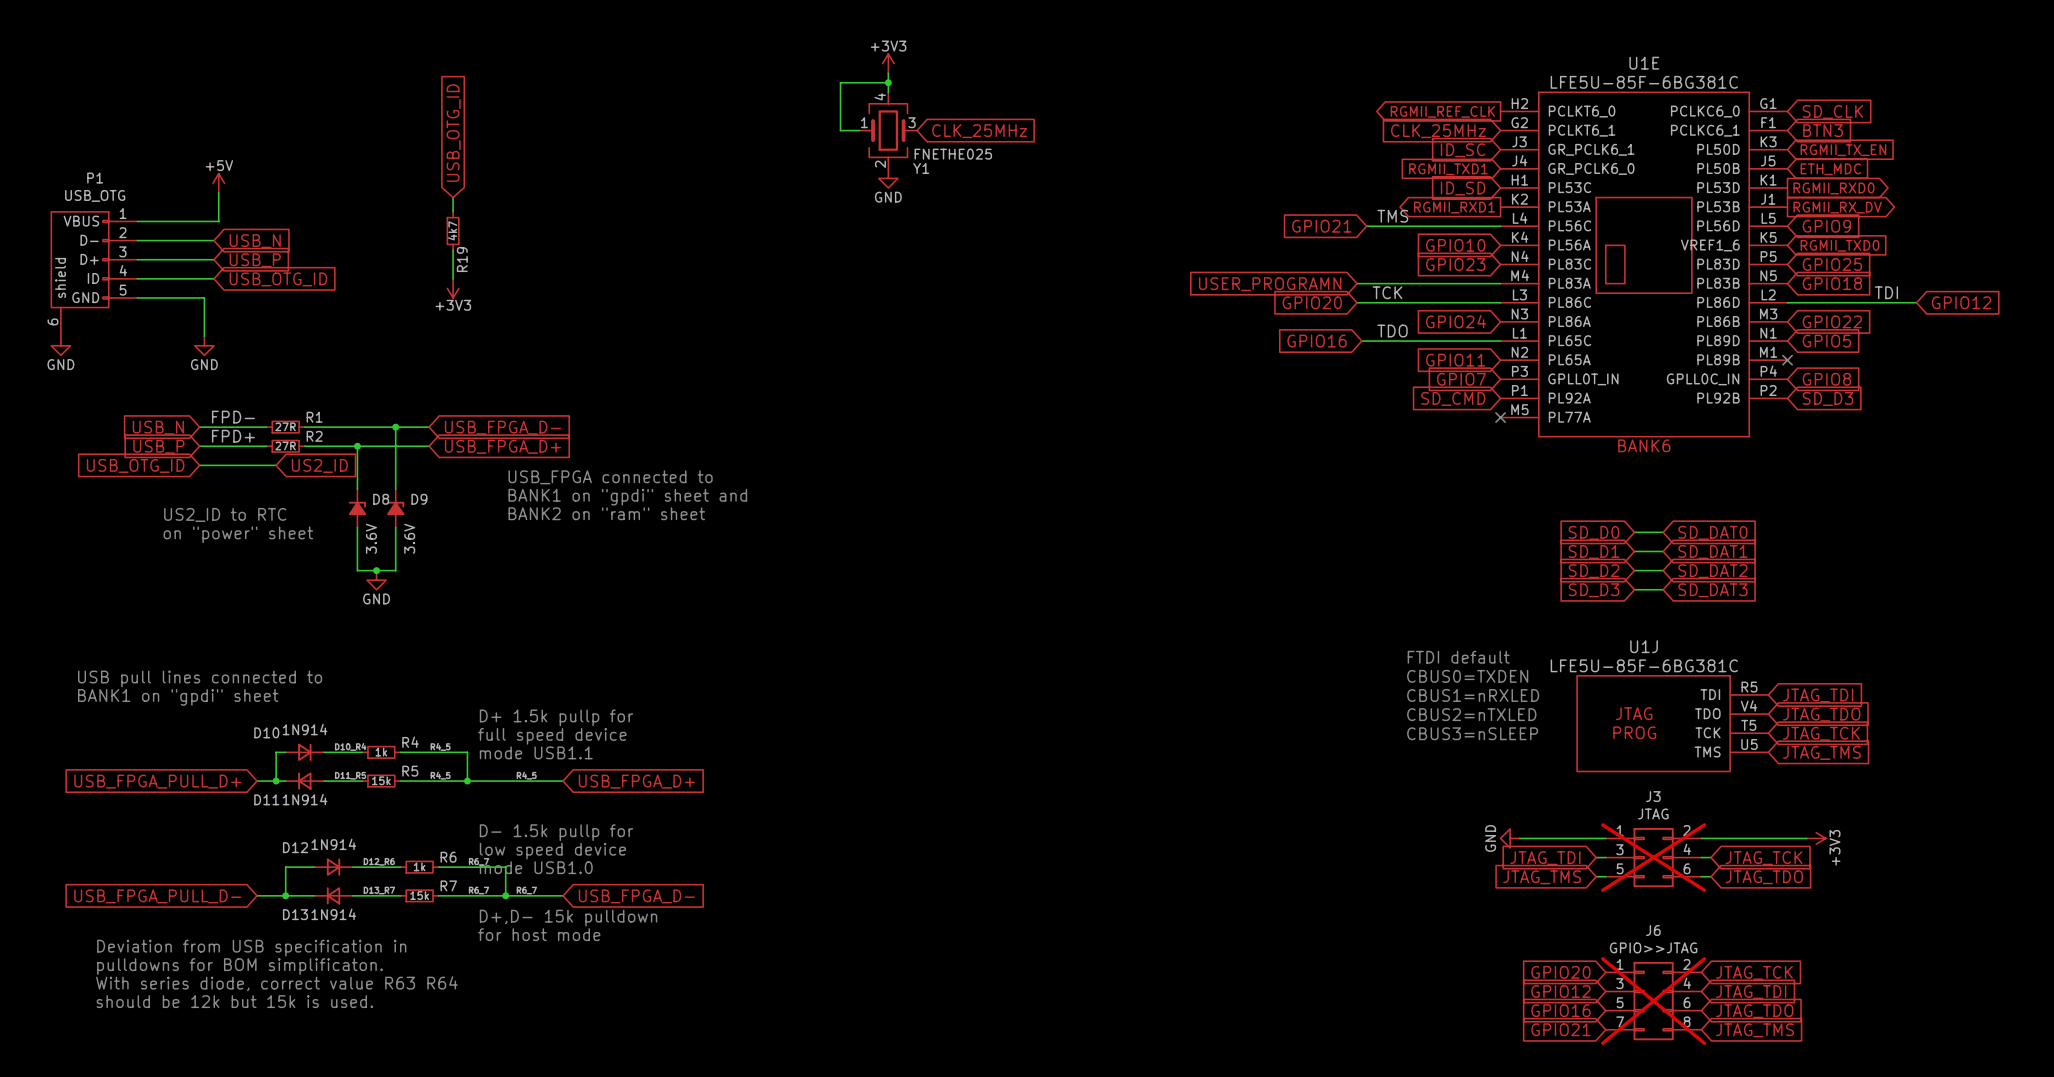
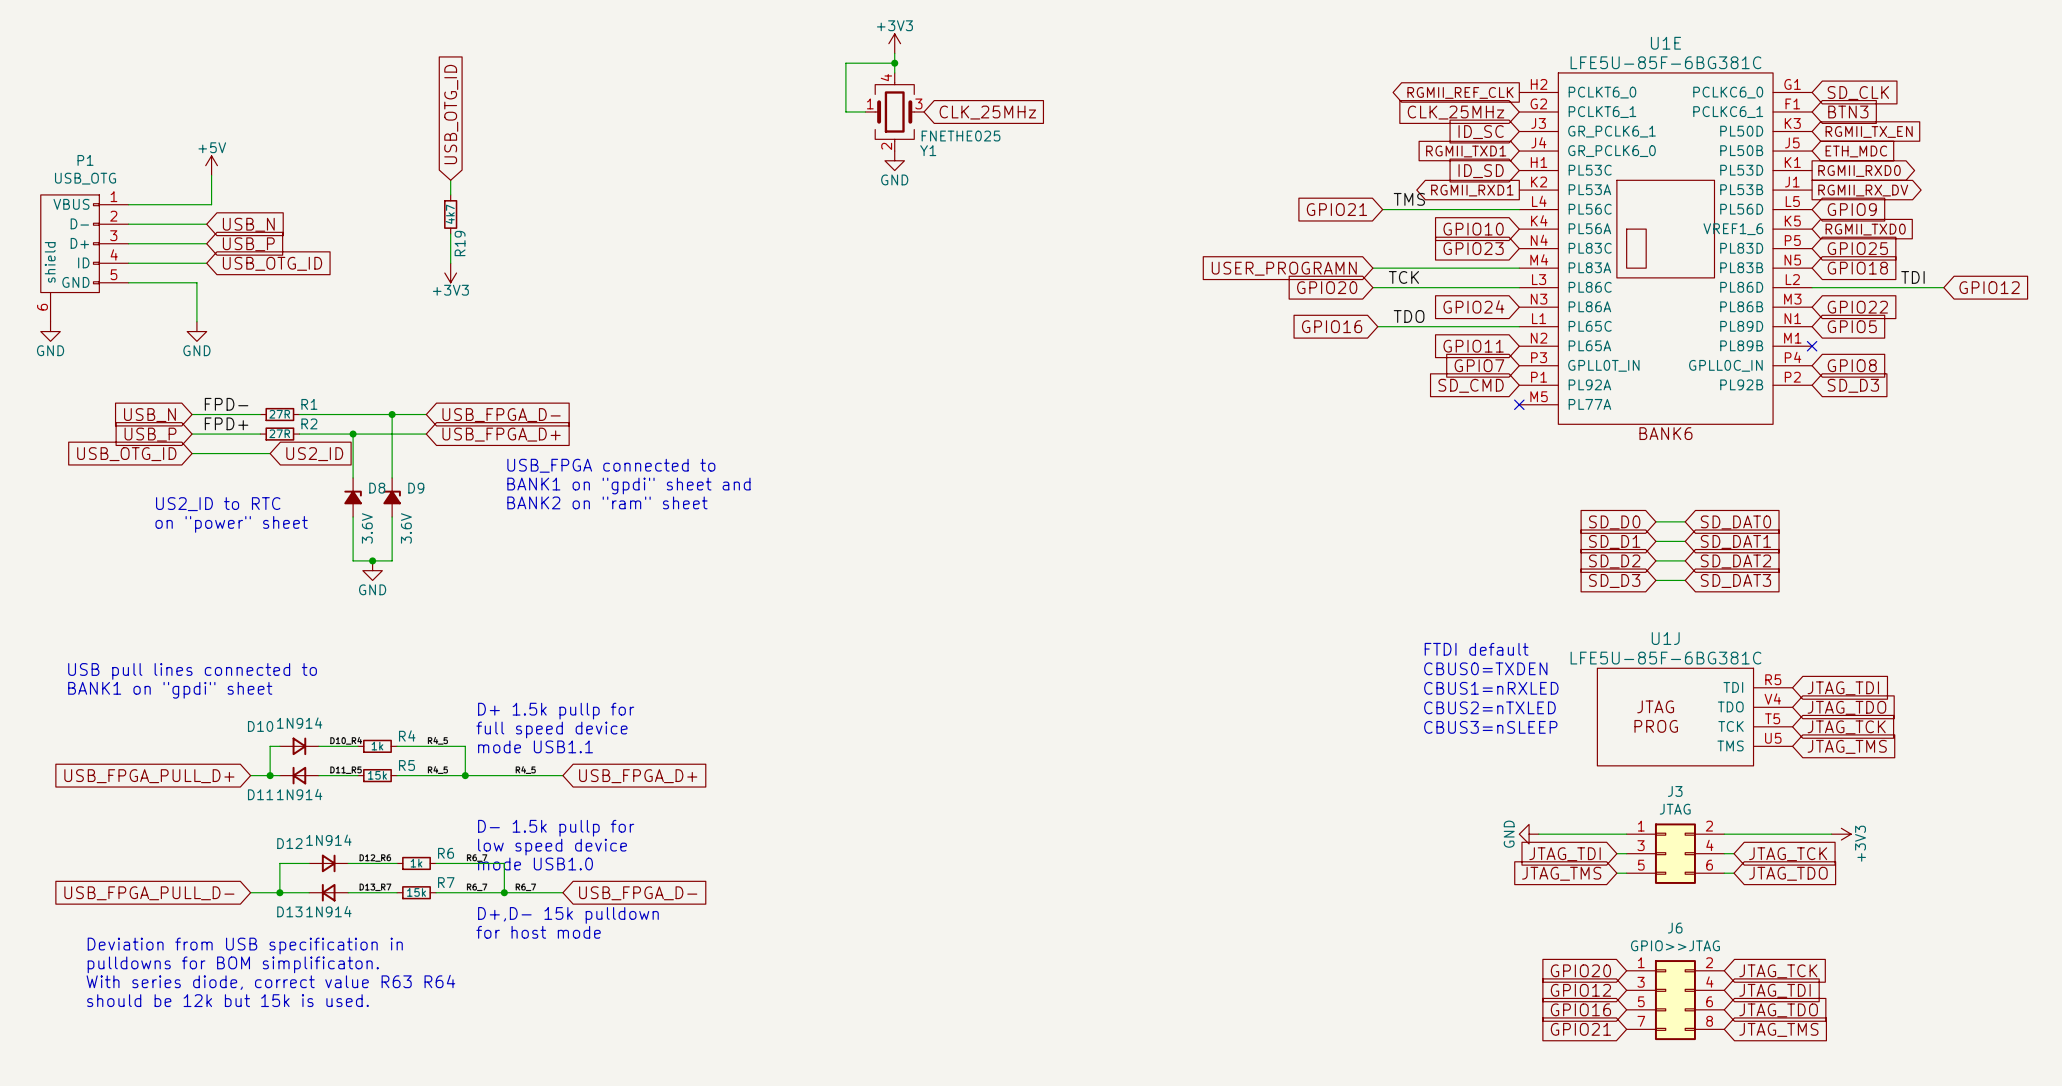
J3 do-not-place cross: (1653, 857) -> none
J6 do-not-place cross: (1653, 1001) -> none

